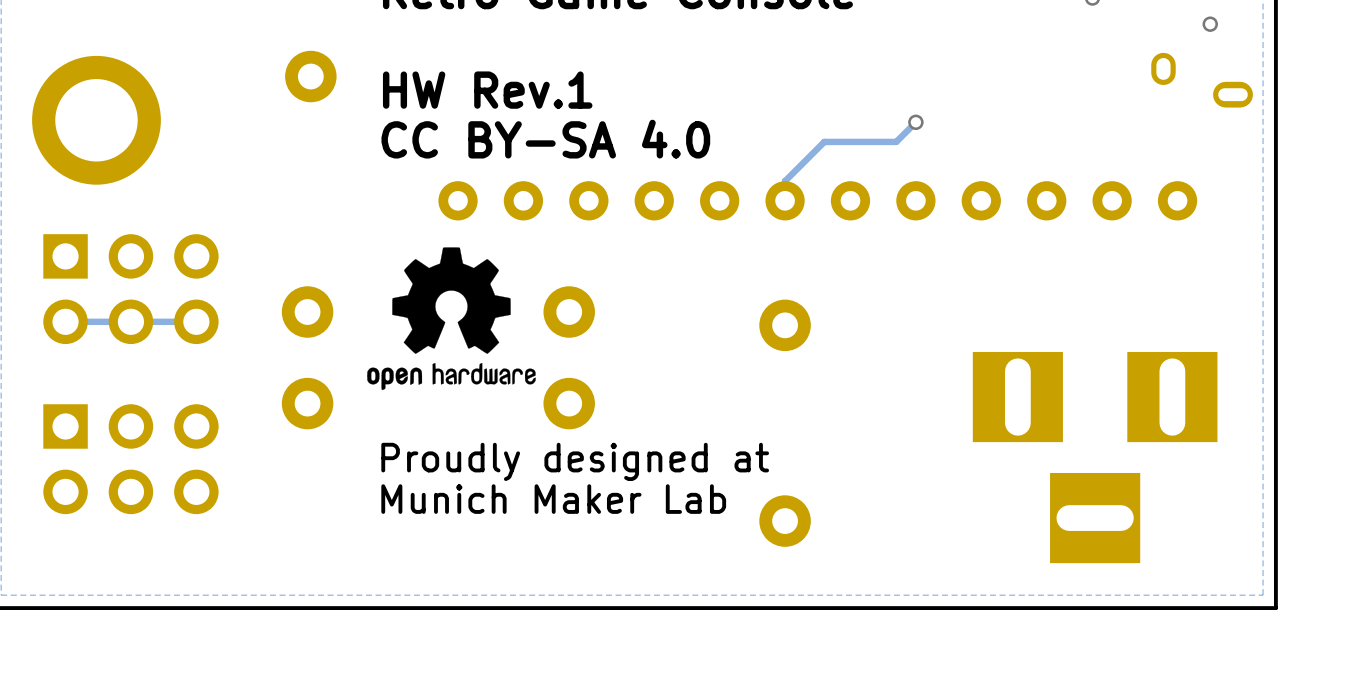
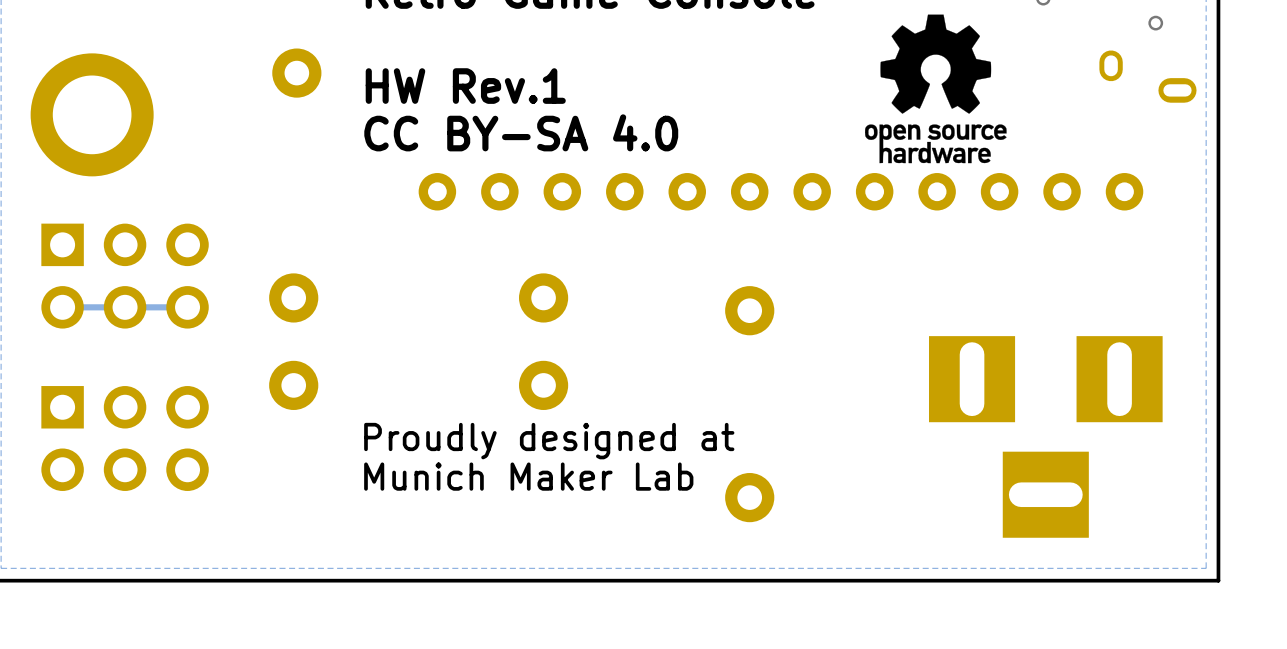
drawing: none -> [865, 14, 1007, 164]
track: (915, 122) (896, 141) (824, 141) (785, 181) (785, 200) -> none
via: (915, 122) -> none
drawing: [367, 247, 536, 391] -> none

